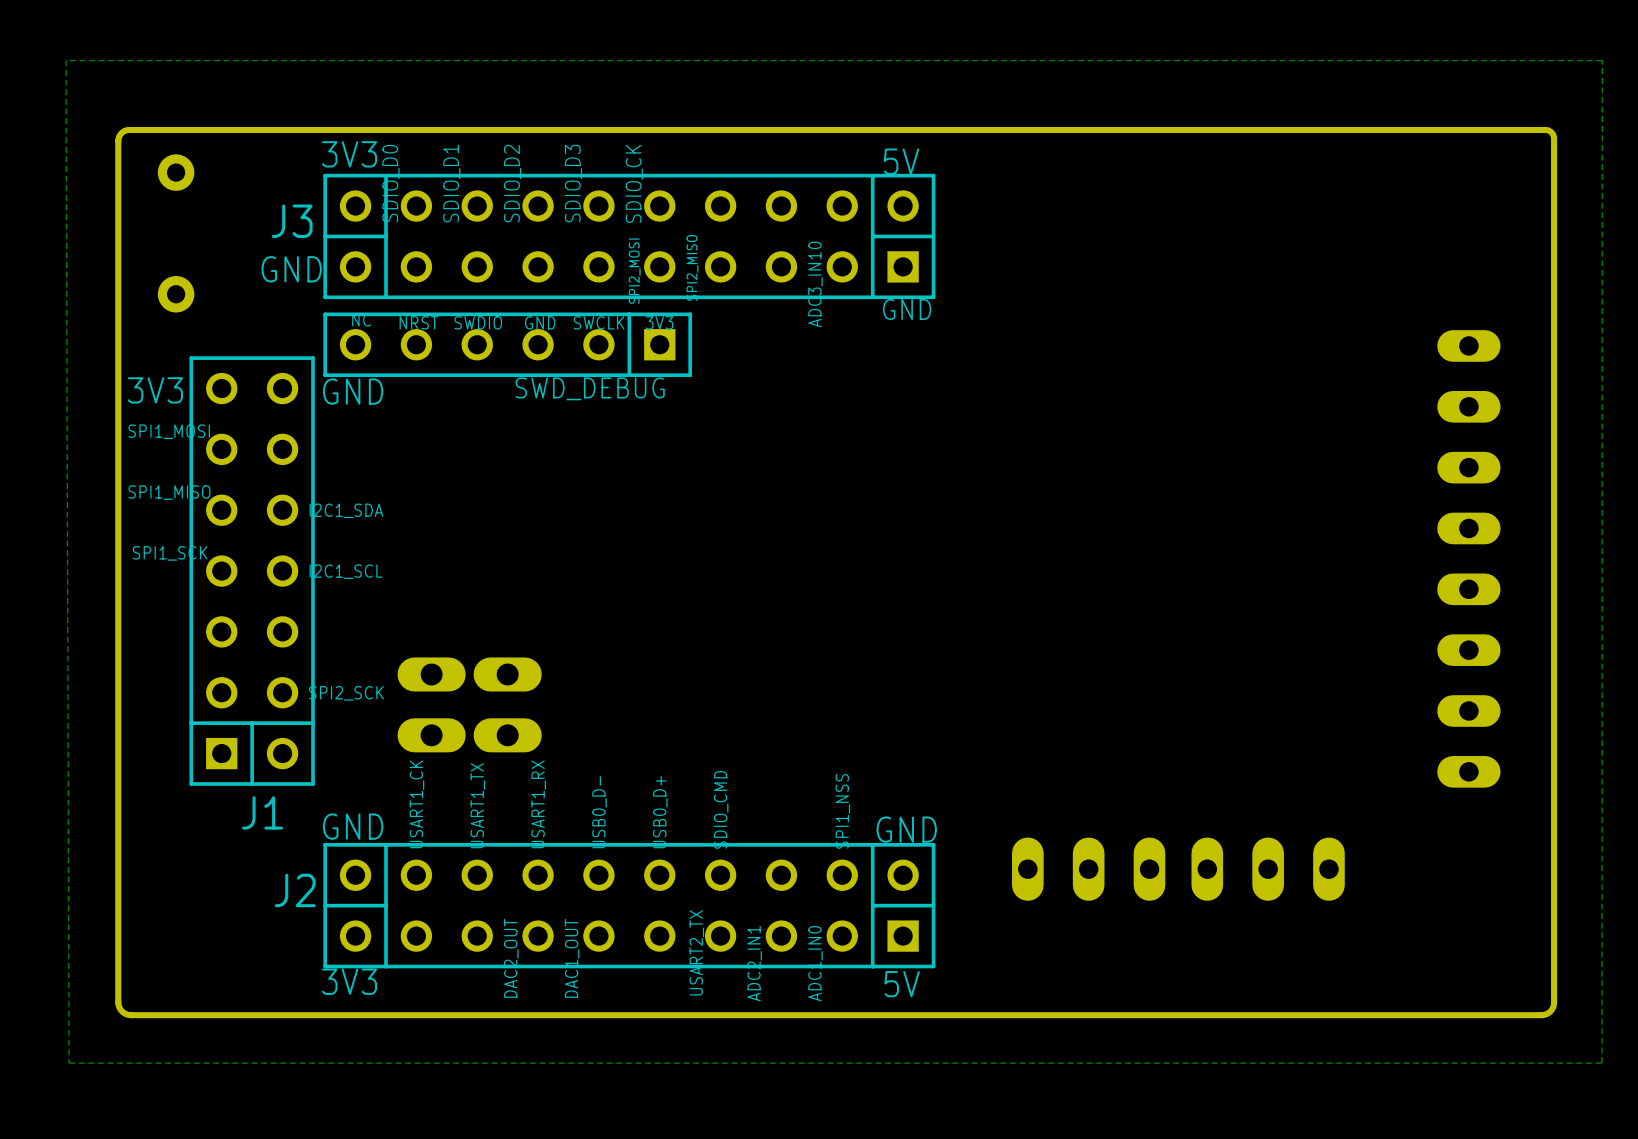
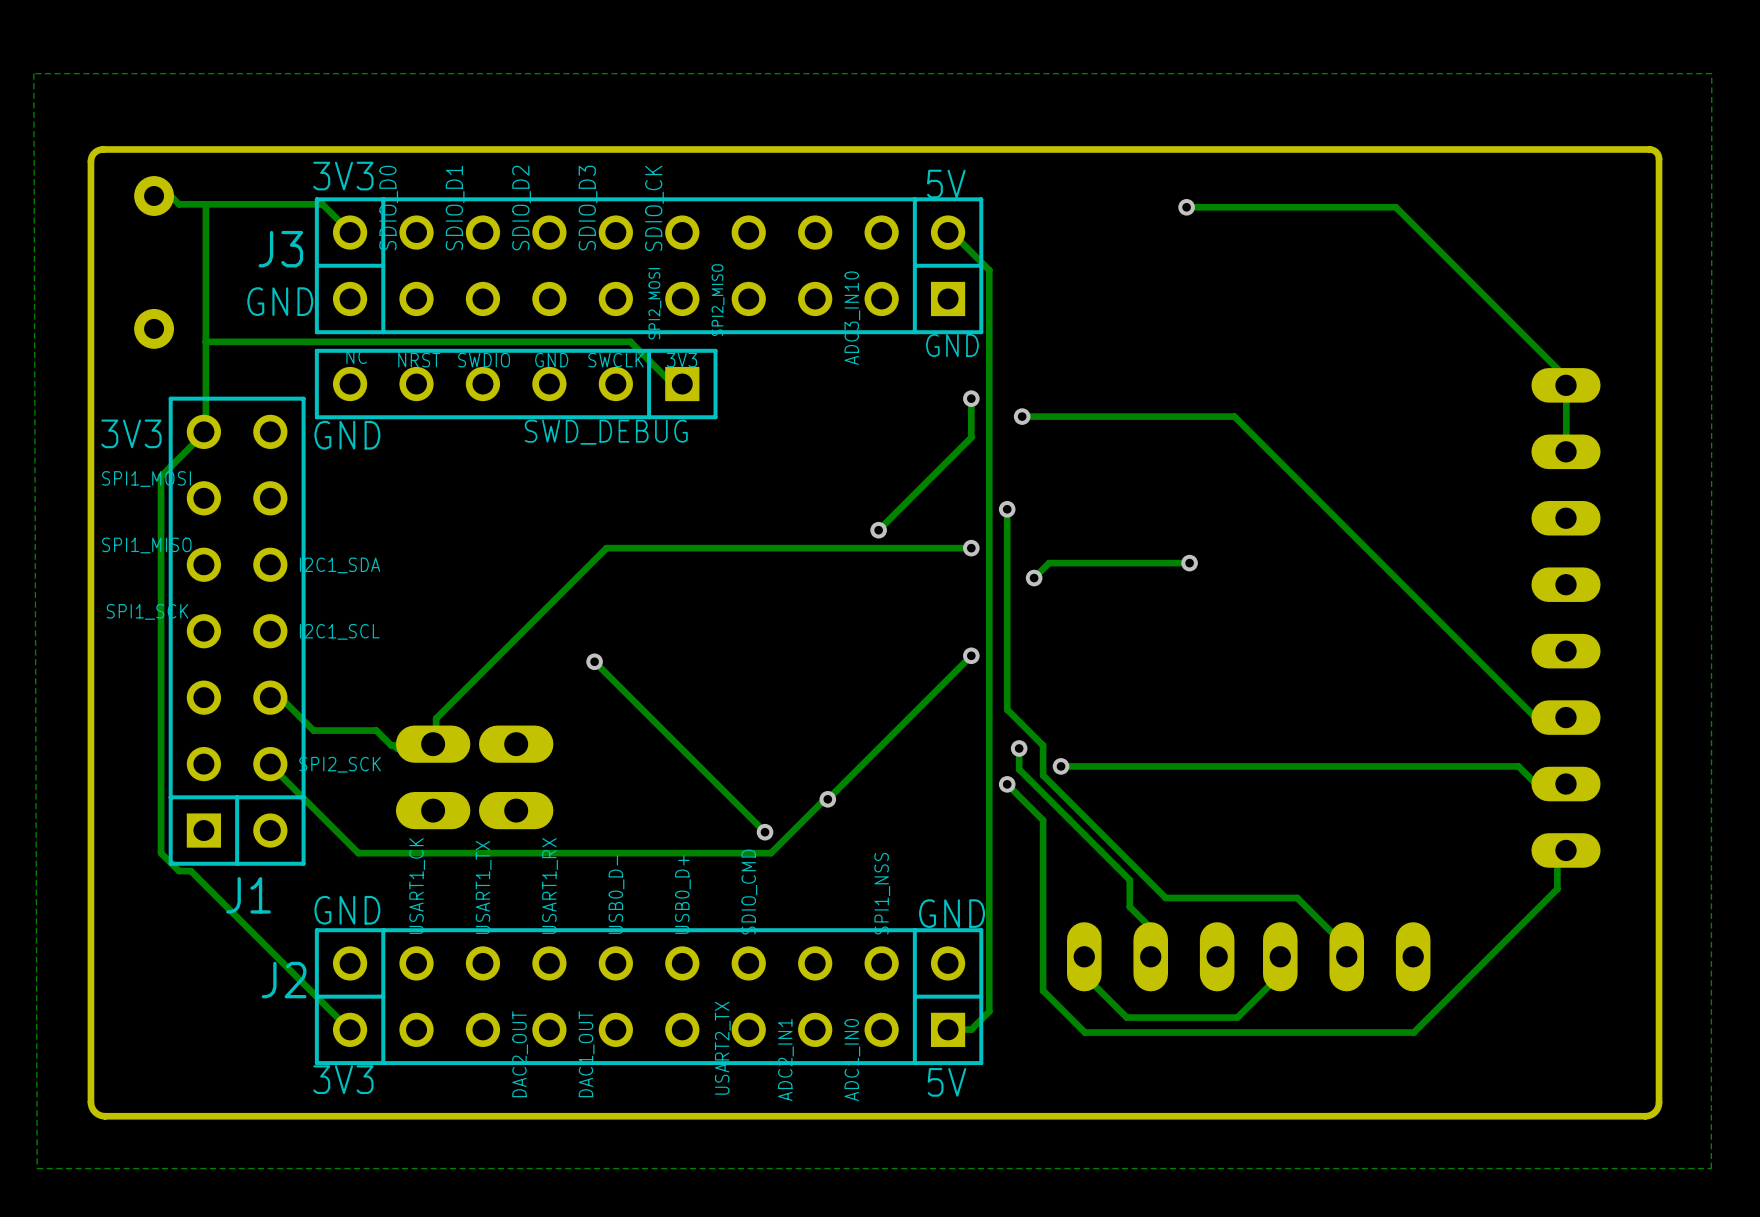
track: none -> (154, 196) (155, 198) (173, 198) (178, 204) (322, 204) (350, 232)
track: none -> (205, 204) (205, 431) (161, 476) (161, 853) (178, 871) (190, 871) (350, 1029)
track: none -> (1186, 207) (1395, 207) (1563, 374) (1563, 383) (1566, 386) (1566, 451)
via: none -> (1186, 207)
track: none -> (948, 232) (950, 231) (989, 270) (989, 1011) (971, 1029) (948, 1029)
track: none -> (205, 341) (630, 341) (672, 383) (682, 384)
track: none -> (971, 398) (971, 437) (878, 530)
via: none -> (971, 398)
track: none -> (1022, 416) (1234, 416) (1533, 715) (1563, 715) (1566, 717)
via: none -> (1022, 416)
track: none -> (1007, 509) (1007, 709) (1043, 745) (1043, 775) (1165, 897) (1297, 897) (1345, 945) (1346, 956)
via: none -> (1007, 509)
via: none -> (878, 530)
track: none -> (971, 548) (606, 548) (436, 718) (436, 742) (430, 748) (397, 748) (391, 745) (376, 730) (313, 730) (280, 697) (270, 697)
via: none -> (971, 548)
track: none -> (1189, 563) (1049, 563) (1034, 578)
via: none -> (1189, 563)
via: none -> (1034, 578)
track: none -> (971, 655) (827, 799) (824, 799) (771, 853) (358, 853) (270, 764)
via: none -> (971, 655)
track: none -> (594, 661) (765, 832)
via: none -> (594, 661)
track: none -> (1019, 748) (1019, 769) (1129, 880) (1129, 906) (1150, 927) (1150, 956)
via: none -> (1019, 748)
track: none -> (1061, 766) (1518, 766) (1533, 781) (1563, 781) (1566, 784)
via: none -> (1061, 766)
track: none -> (1007, 784) (1043, 820) (1043, 990) (1084, 1032) (1413, 1032) (1557, 889) (1557, 859) (1566, 850)
via: none -> (1007, 784)
via: none -> (827, 799)
via: none -> (765, 832)
track: none -> (1280, 956) (1279, 975) (1237, 1017) (1126, 1017) (1084, 975) (1084, 956)

